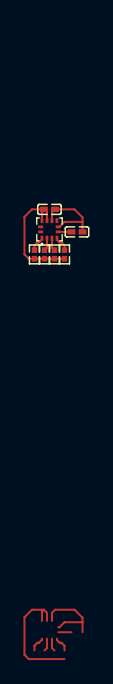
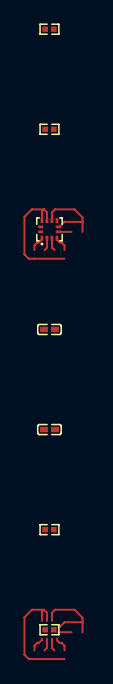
part: none -> (49, 29)
part: none -> (49, 129)
part: (49, 209) -> none
part: (76, 231) -> none
part: (34, 254) -> none
part: (44, 254) -> none
part: (54, 254) -> none
part: (64, 254) -> none
part: none -> (49, 329)
part: none -> (49, 429)
part: none -> (49, 529)
part: none -> (49, 629)

